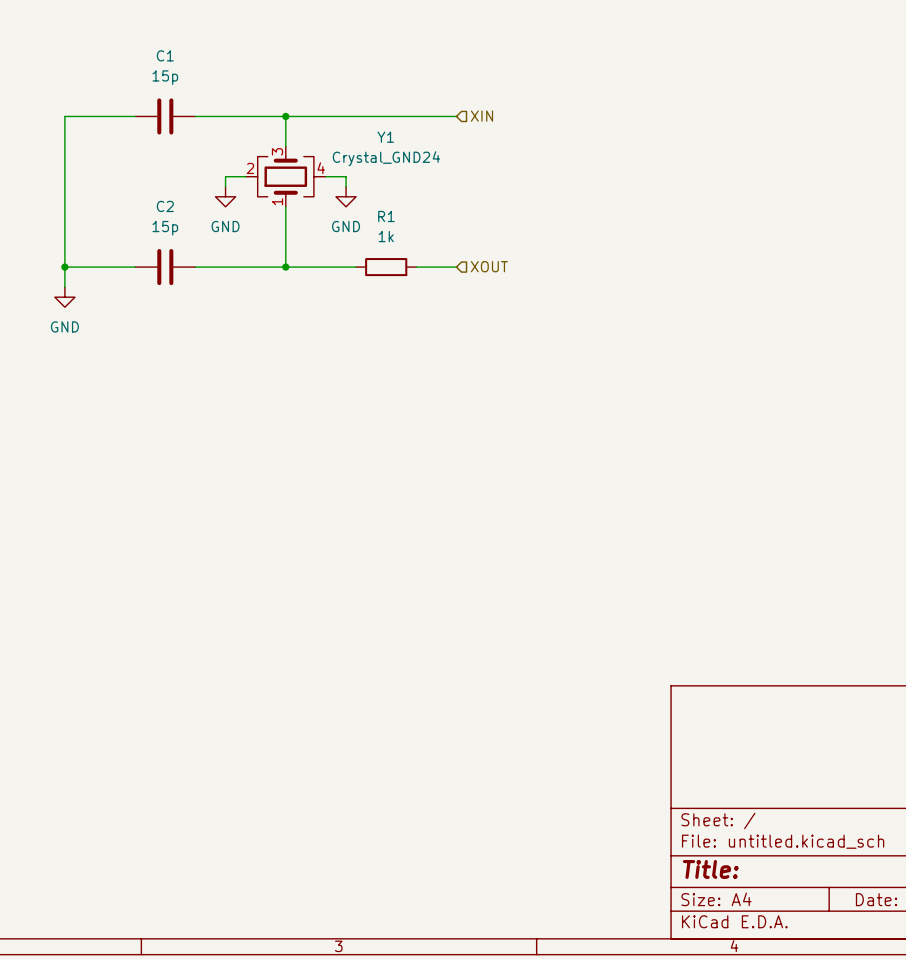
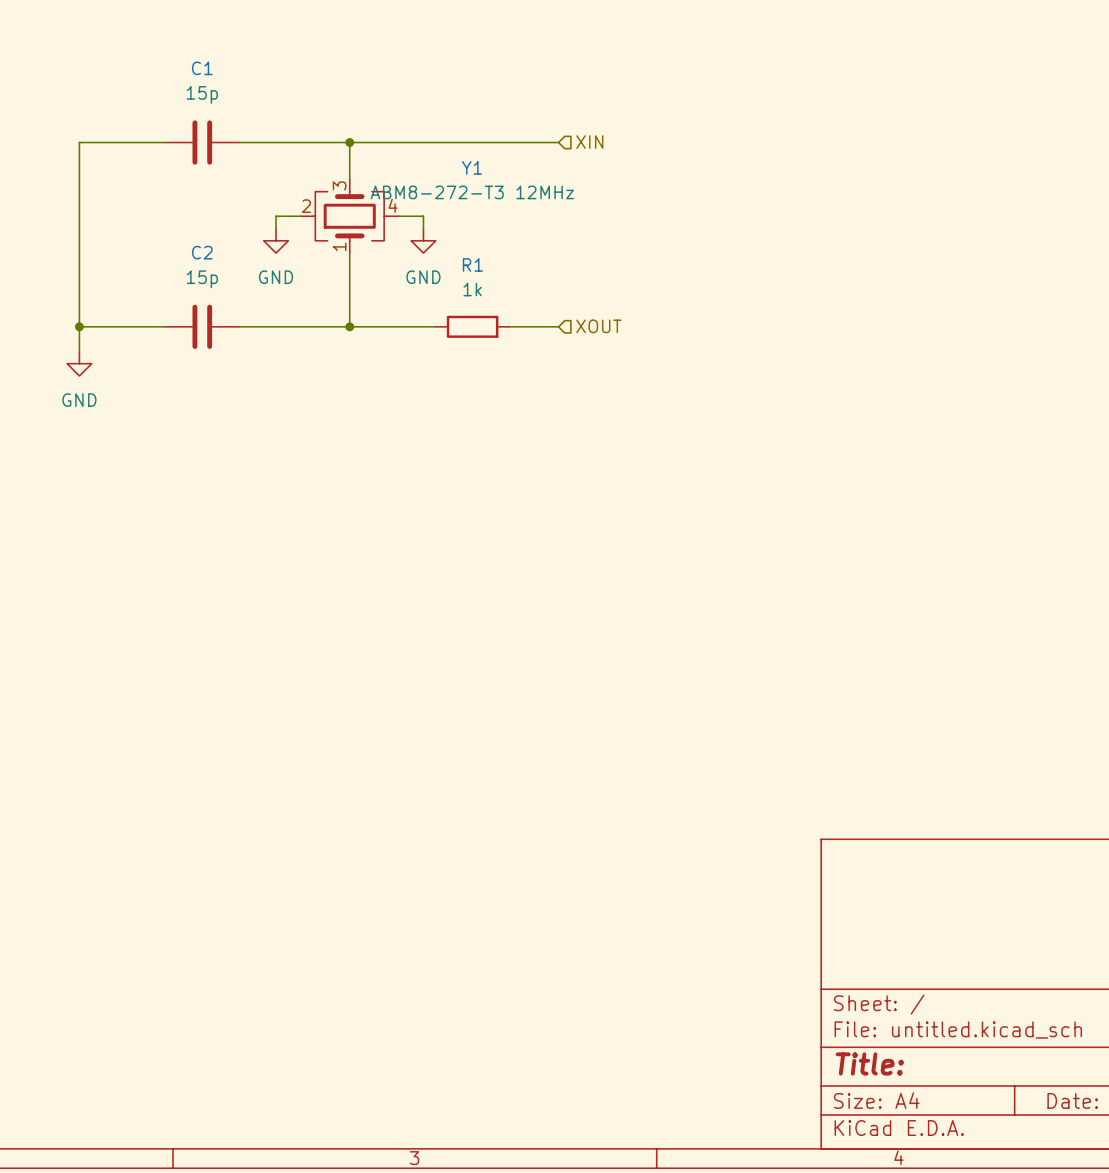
Y1 value: Crystal_GND24 (386, 158) -> ABM8-272-T3 12MHz (472, 192)

